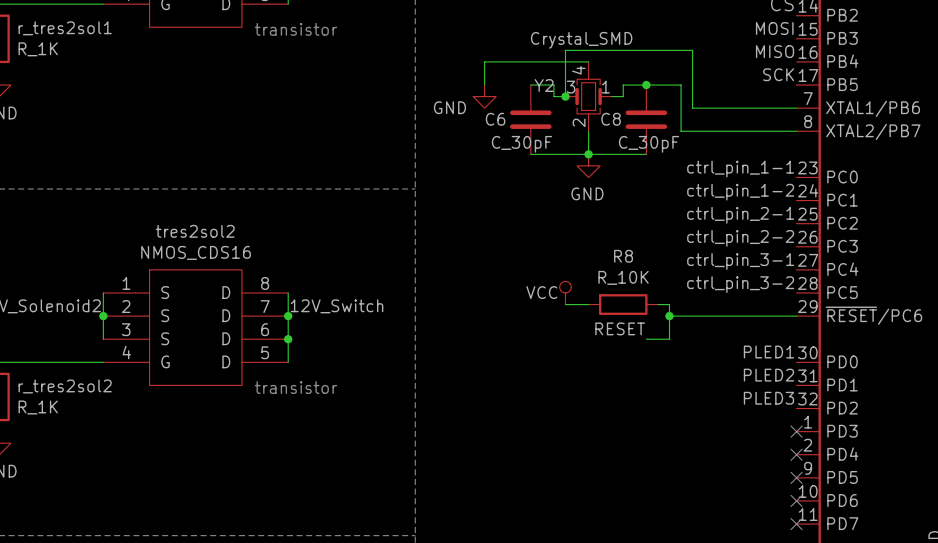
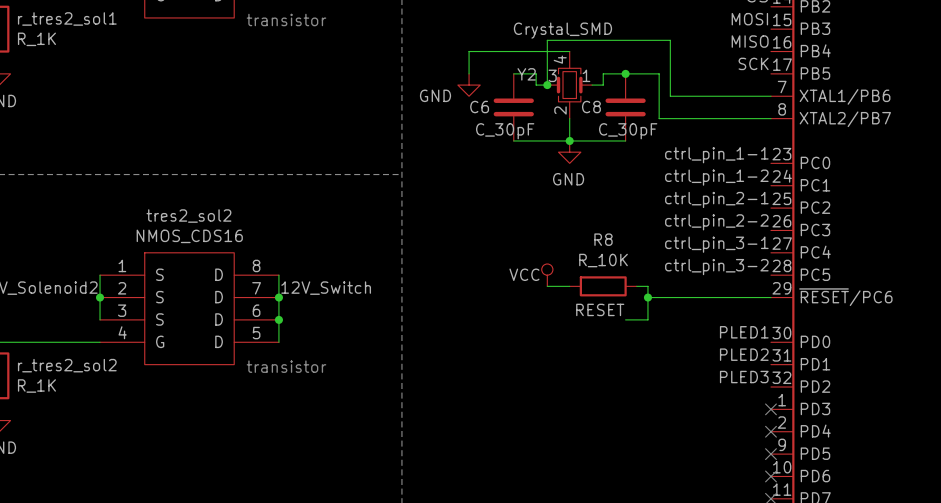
r_tres2sol1 name: r_tres2sol1 (65, 28) -> r_tres2_sol1 (67, 18)
tres2sol2 name: tres2sol2 (195, 231) -> tres2_sol2 (188, 216)
r_tres2sol2 name: r_tres2sol2 (65, 386) -> r_tres2_sol2 (67, 365)

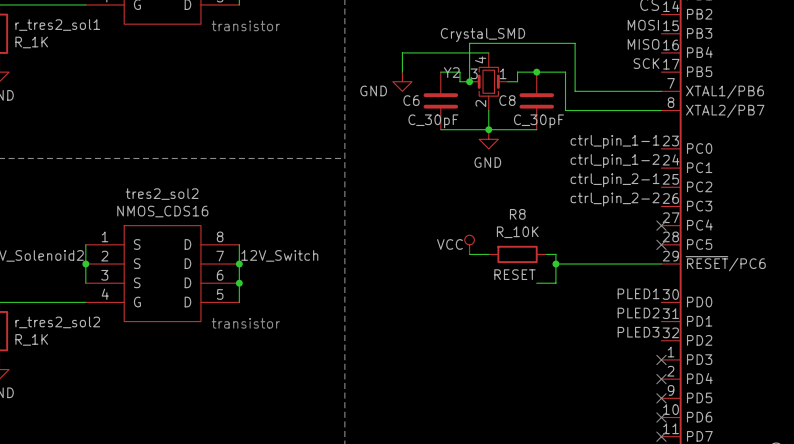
label: ctrl_pin_3-1 (716, 244) -> none
no-connect mark: none -> (661, 225)
label: ctrl_pin_3-2 (716, 267) -> none
no-connect mark: none -> (661, 244)

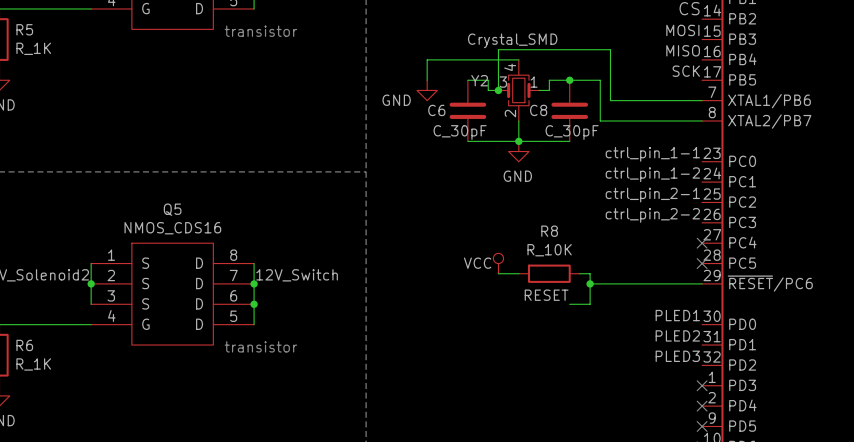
r_tres2_sol1 name: r_tres2_sol1 (57, 25) -> R5 (24, 29)
tres2_sol2 name: tres2_sol2 (162, 194) -> Q5 (172, 209)
r_tres2_sol2 name: r_tres2_sol2 (57, 322) -> R6 (24, 345)

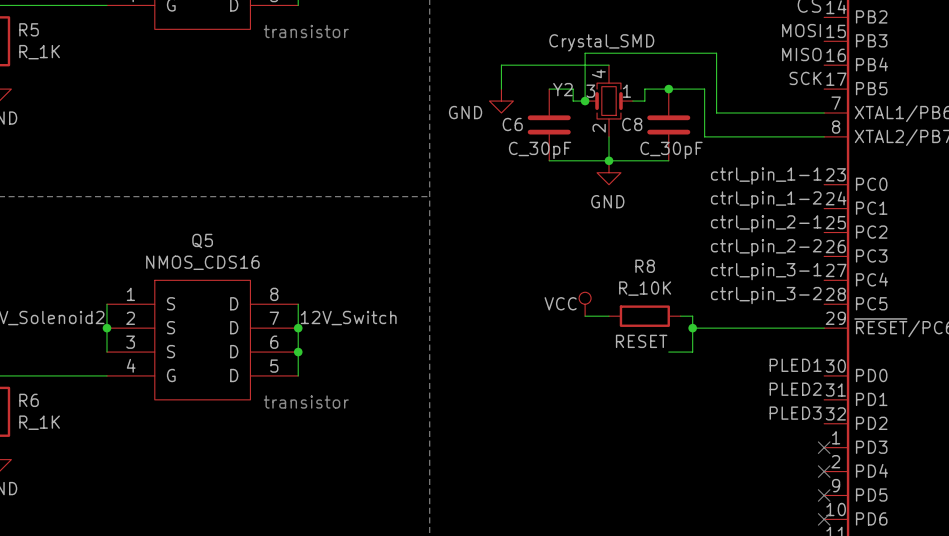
label: none -> ctrl_pin_3-1 (766, 271)
no-connect mark: (702, 243) -> none
label: none -> ctrl_pin_3-2 (766, 295)
no-connect mark: (702, 263) -> none

